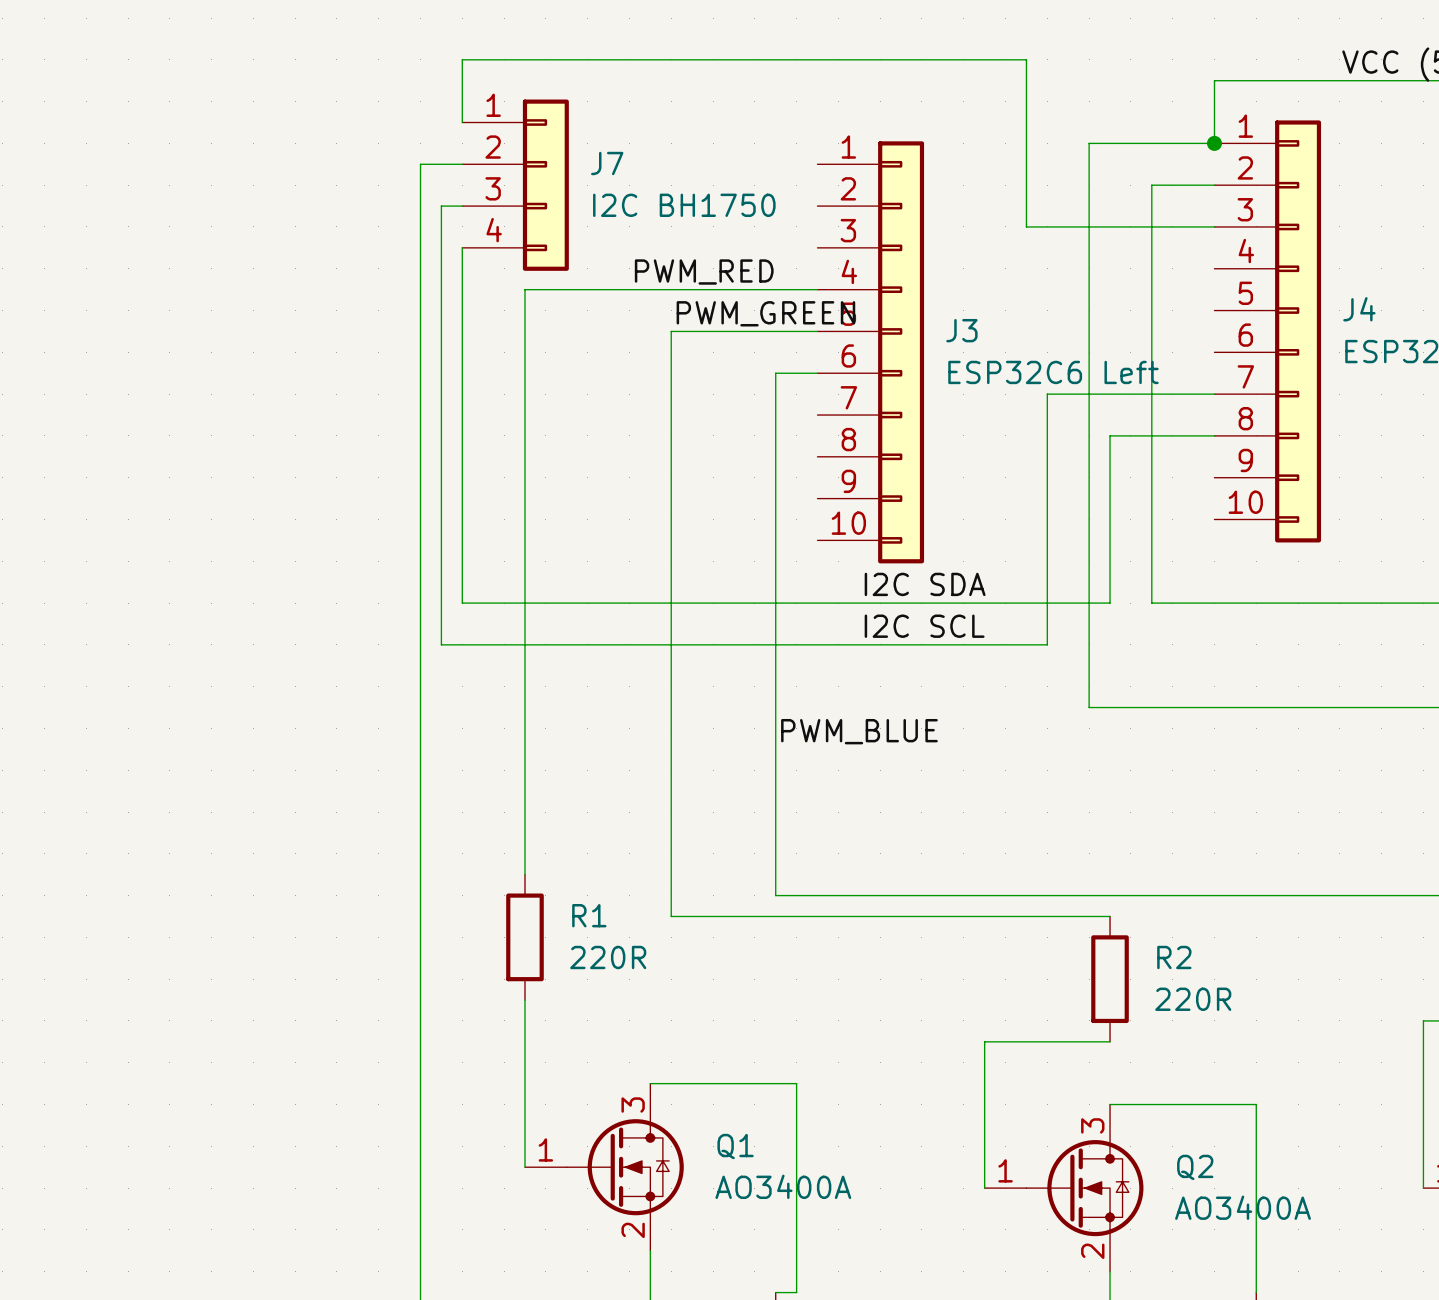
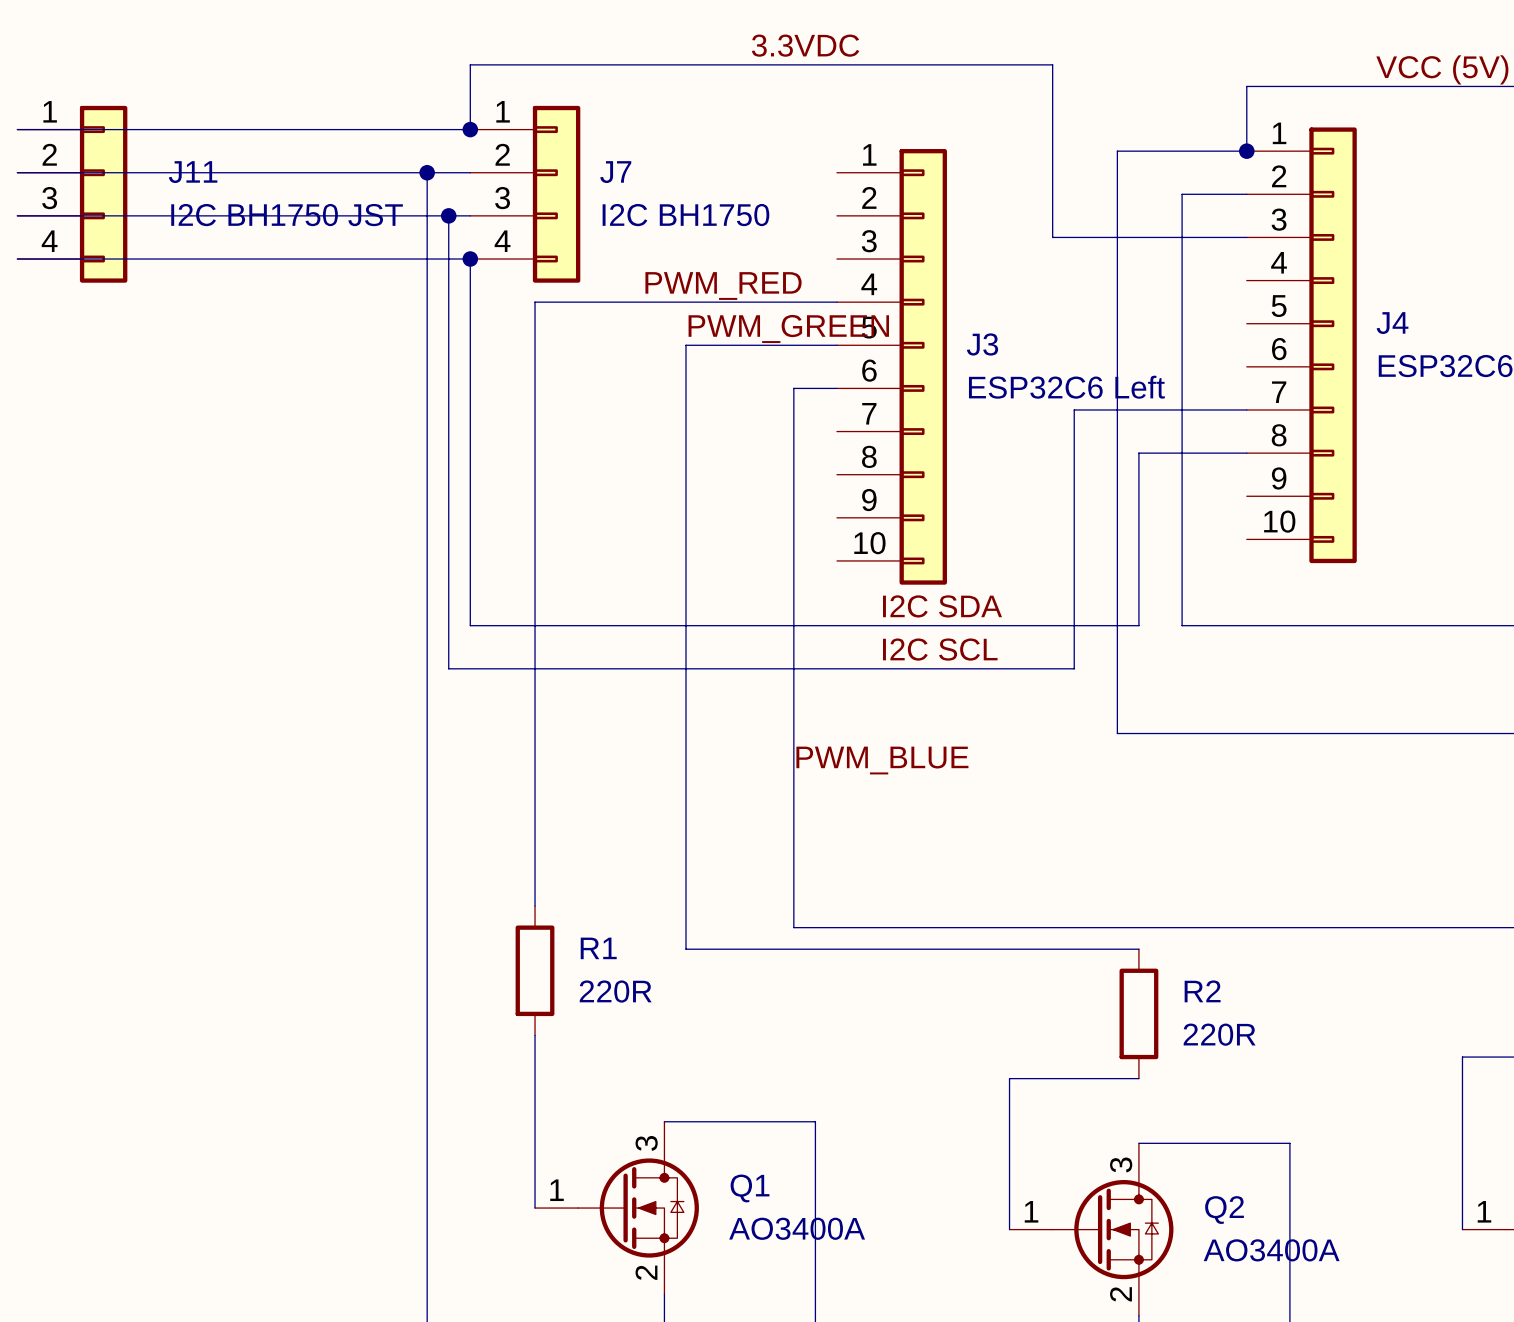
label: none -> 3.3VDC (805, 45)
wire: none -> (17, 129) (470, 129)
junction: none -> (470, 129)
wire: none -> (17, 172) (427, 172)
junction: none -> (427, 172)
J11: none -> I2C BH1750 JST (72, 194)
wire: none -> (17, 215) (448, 215)
junction: none -> (448, 215)
wire: none -> (17, 259) (470, 259)
junction: none -> (470, 259)

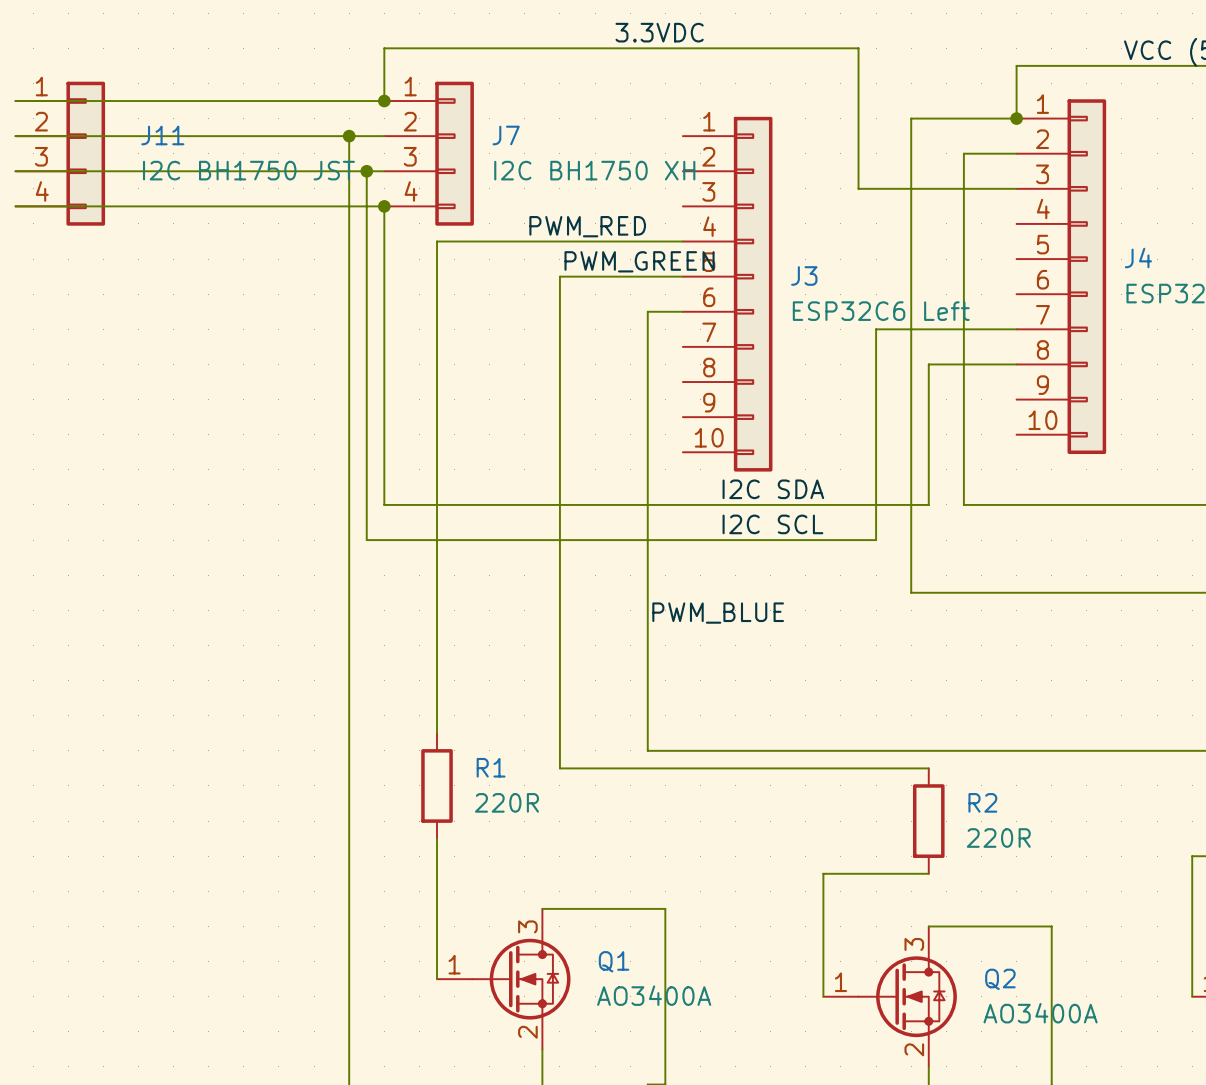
J7 value: I2C BH1750 (685, 215) -> I2C BH1750 XH (594, 170)

